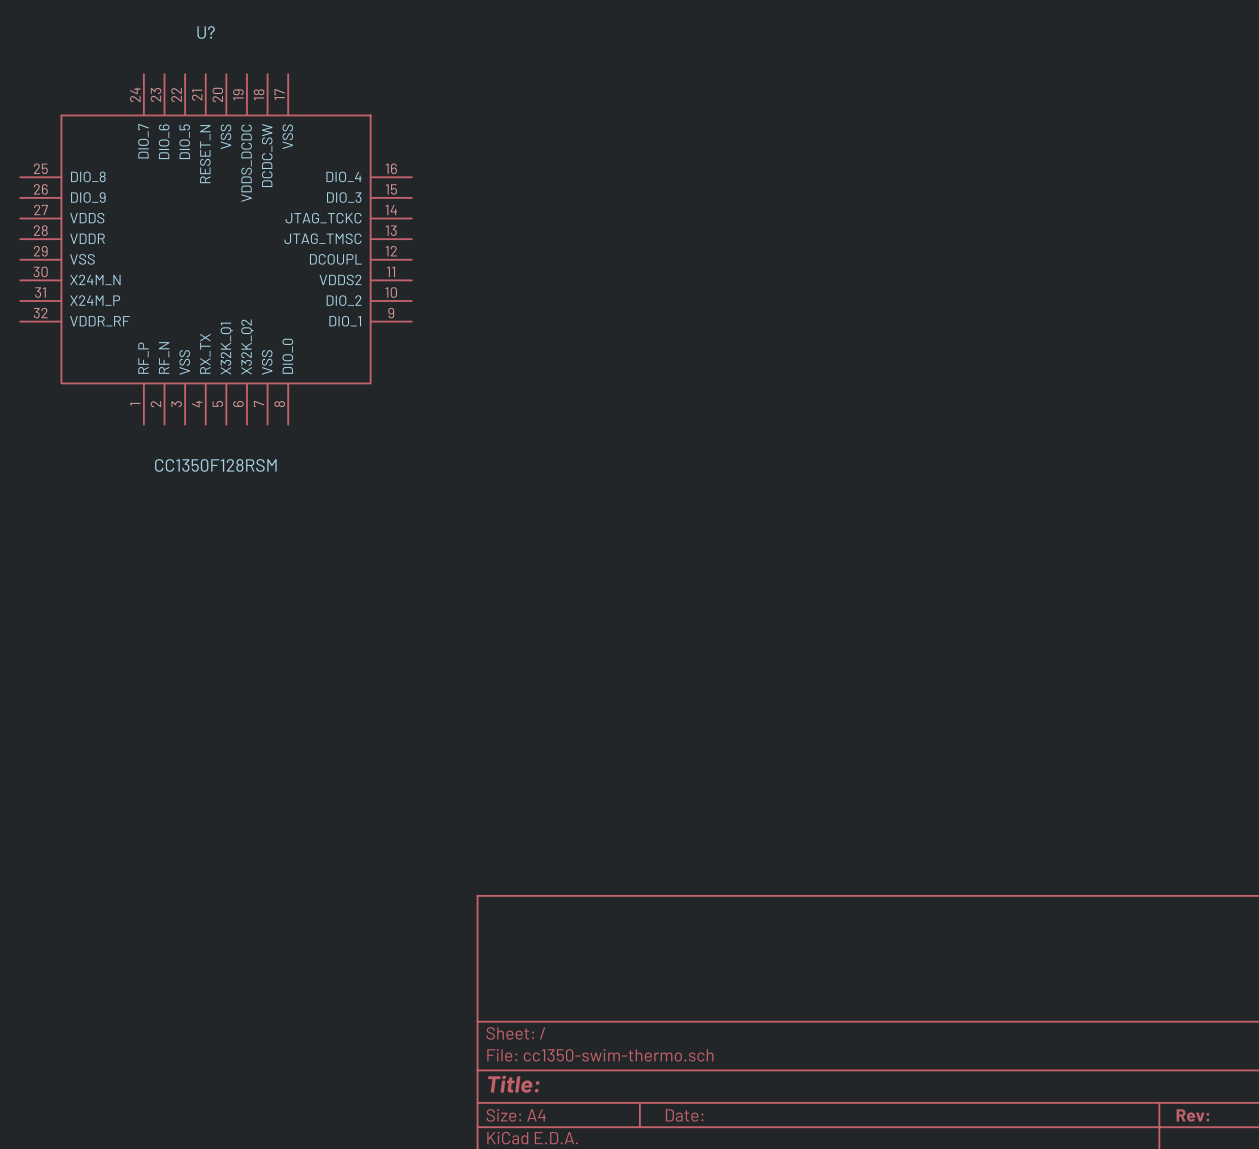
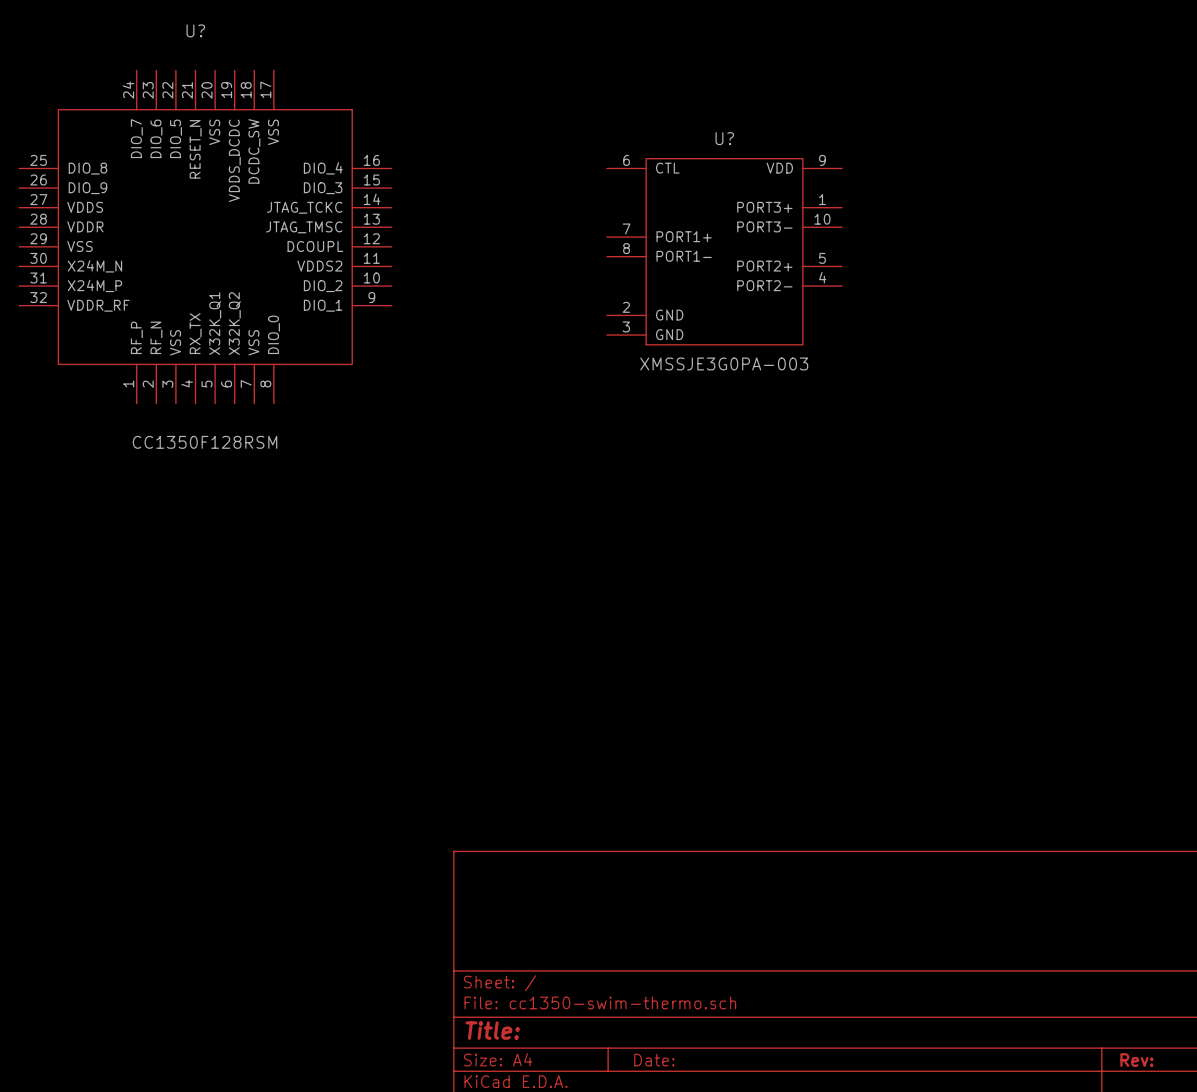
U?: none -> XMSSJE3G0PA-003 (724, 251)

